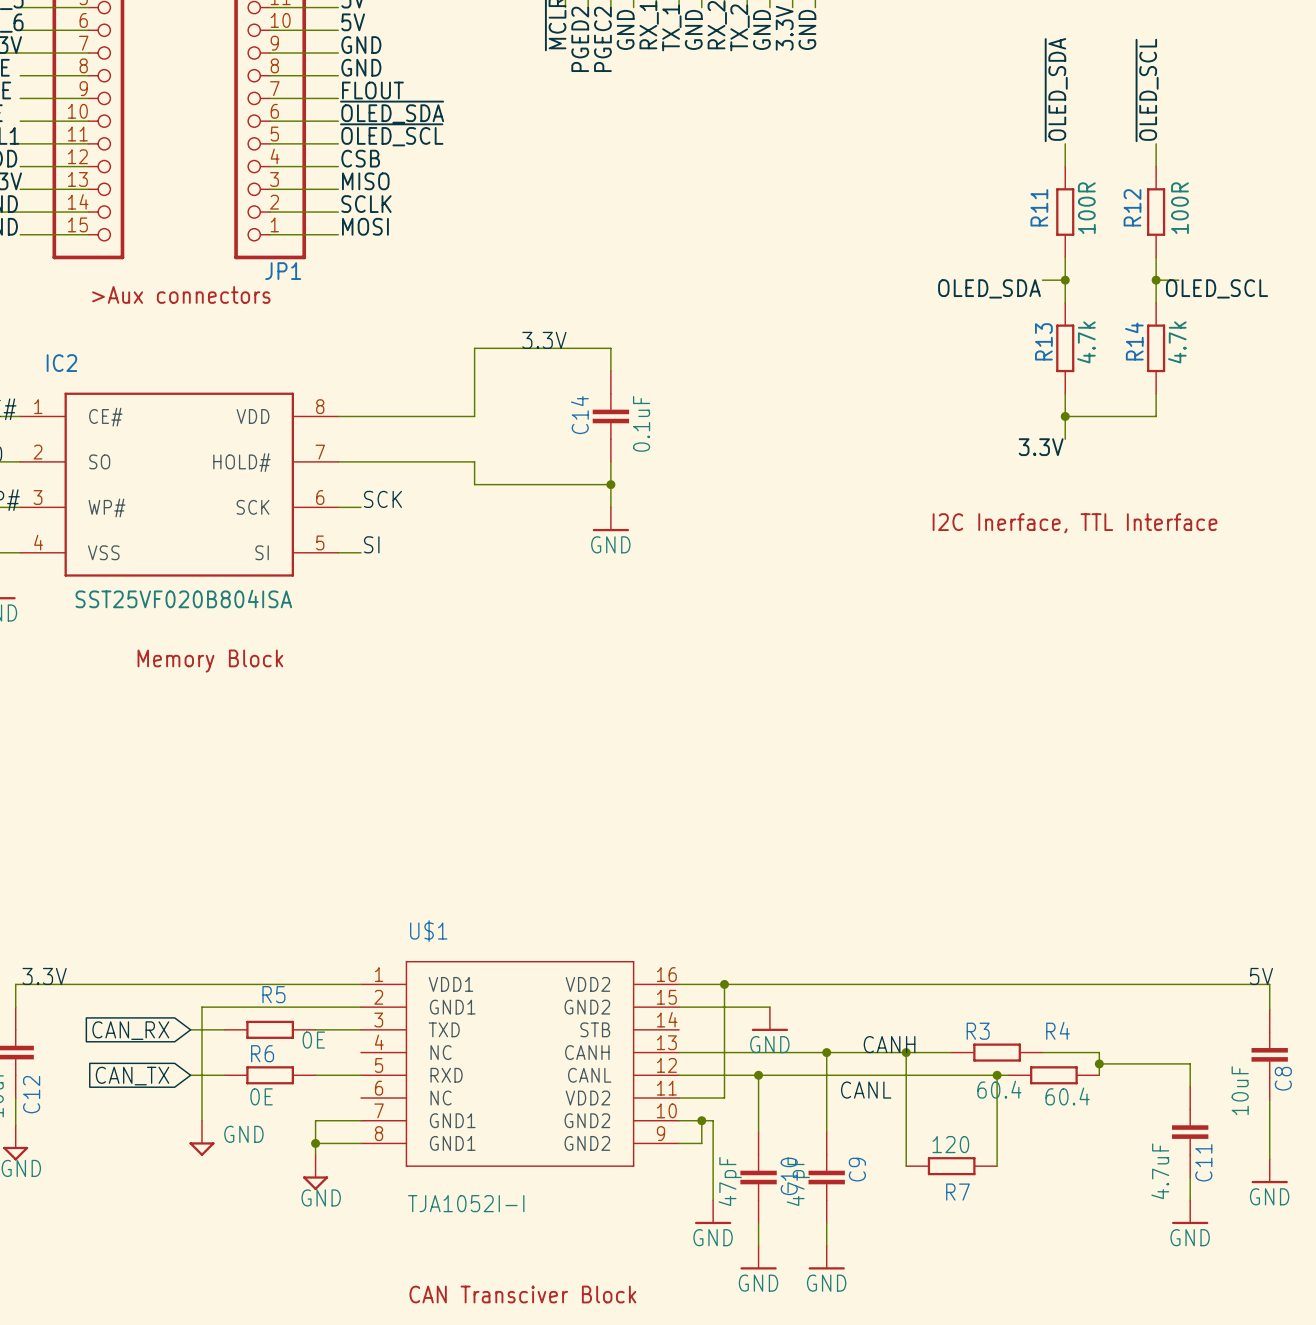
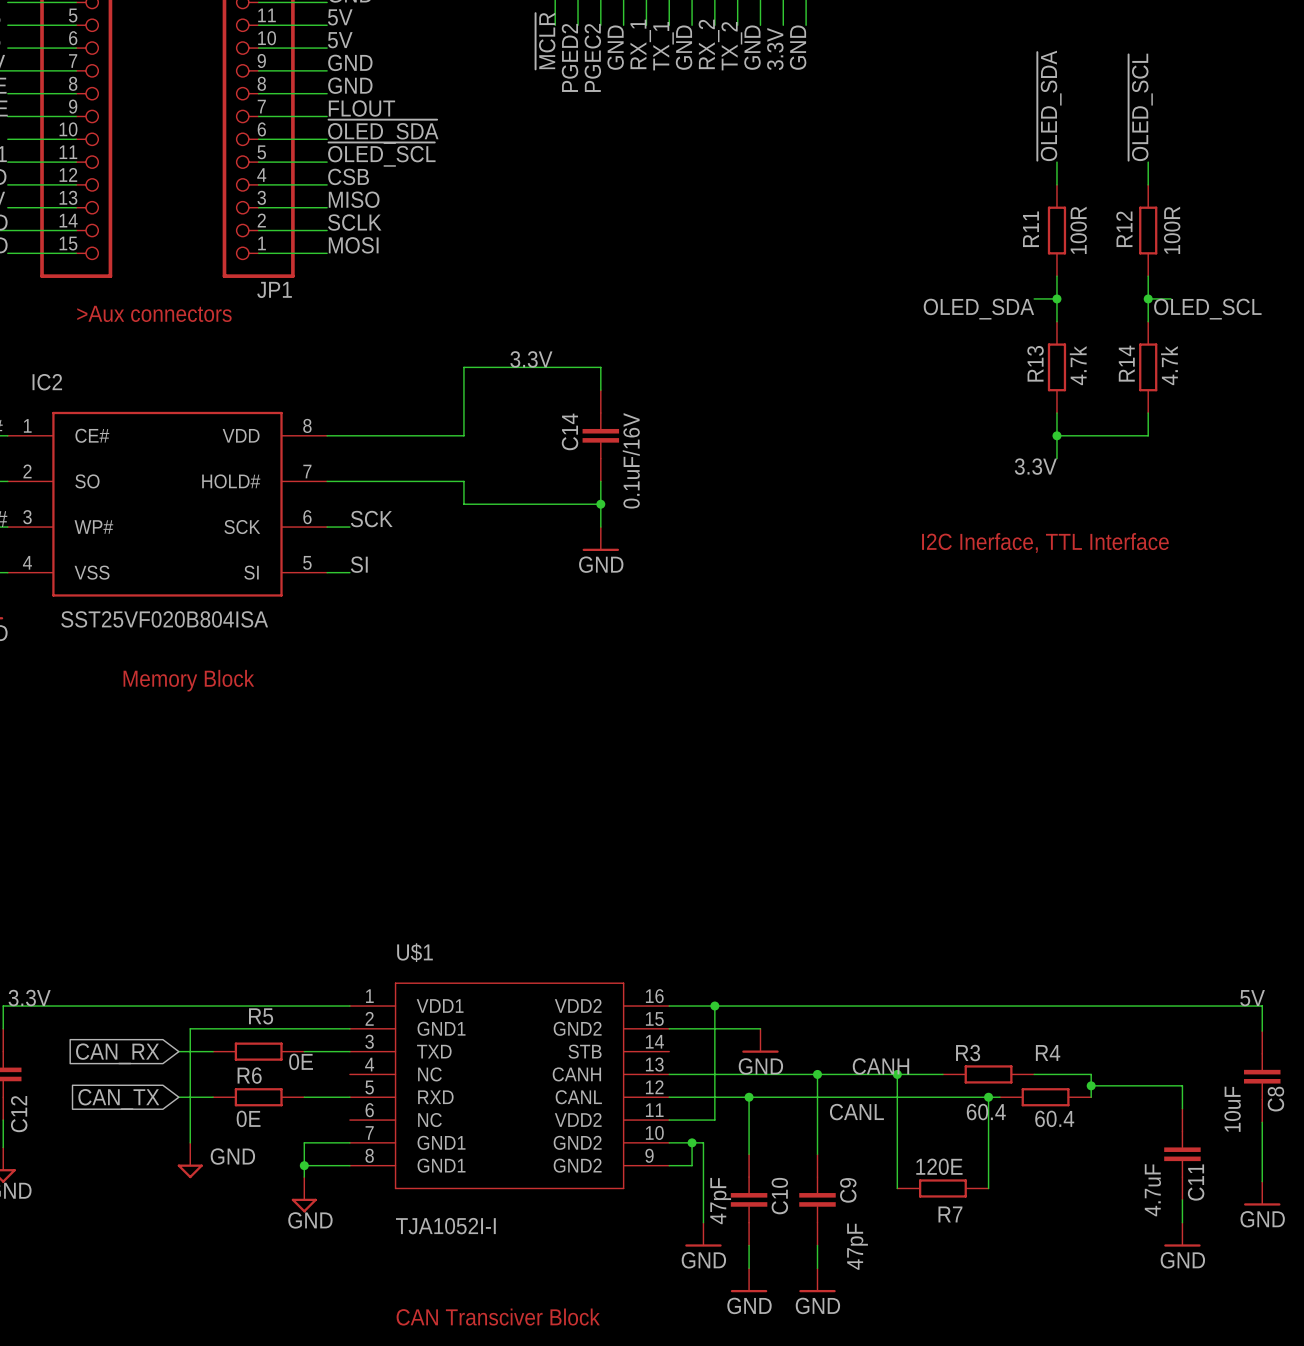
C14 value: 0.1uF (641, 423) -> 0.1uF/16V (631, 460)
R7 value: 120 (950, 1144) -> 120E (939, 1166)
C9 value position: 47pF (798, 1181) -> 47pF (857, 1246)

